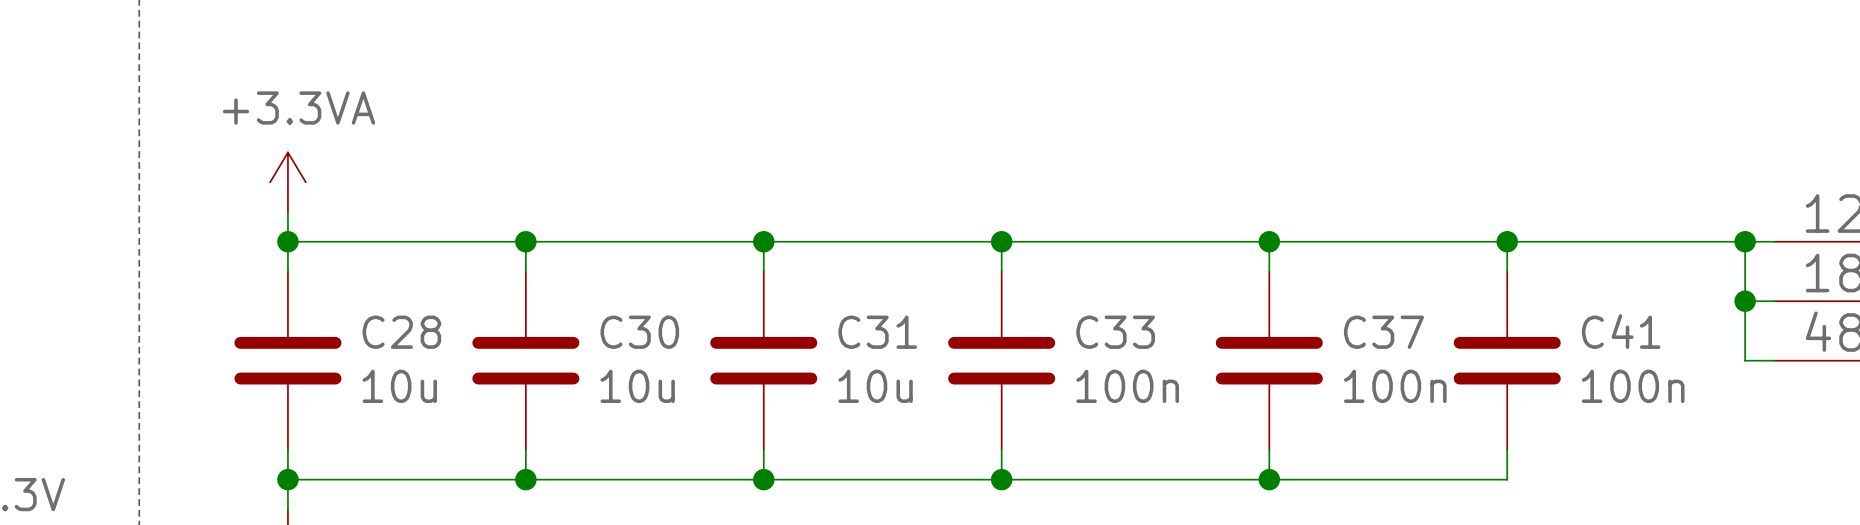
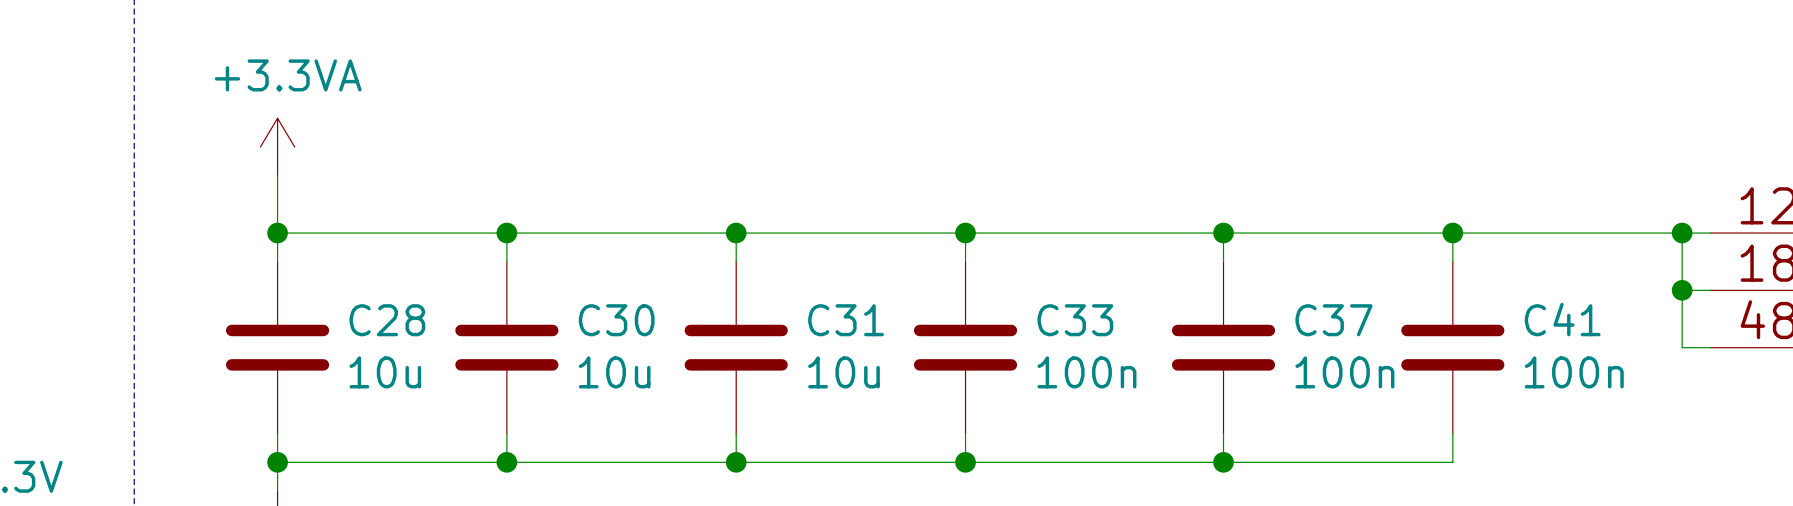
power symbol position: +3.3VA (287, 182) -> +3.3VA (277, 147)

